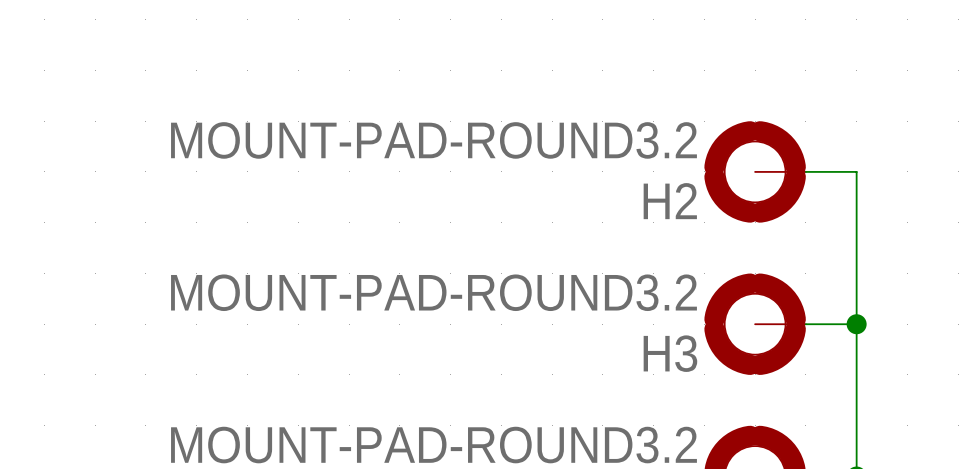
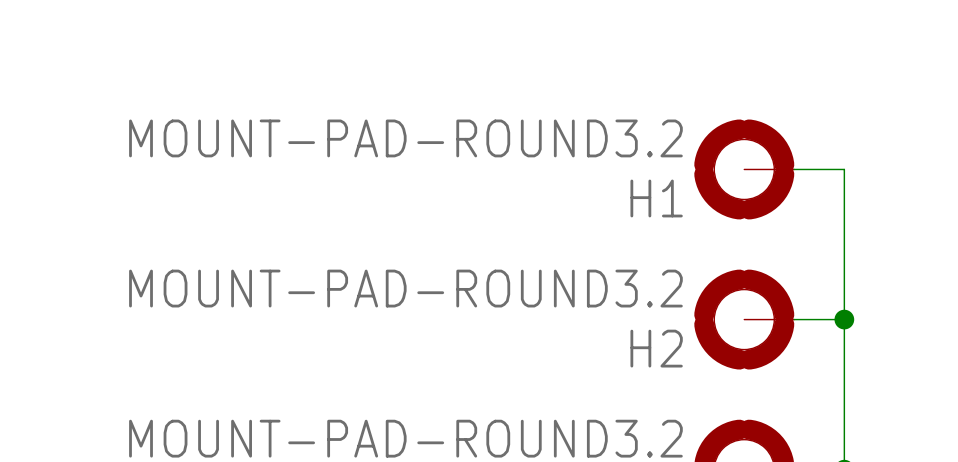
H2 name: H2 (670, 201) -> H1 (656, 198)
H3 name: H3 (670, 353) -> H2 (656, 348)

